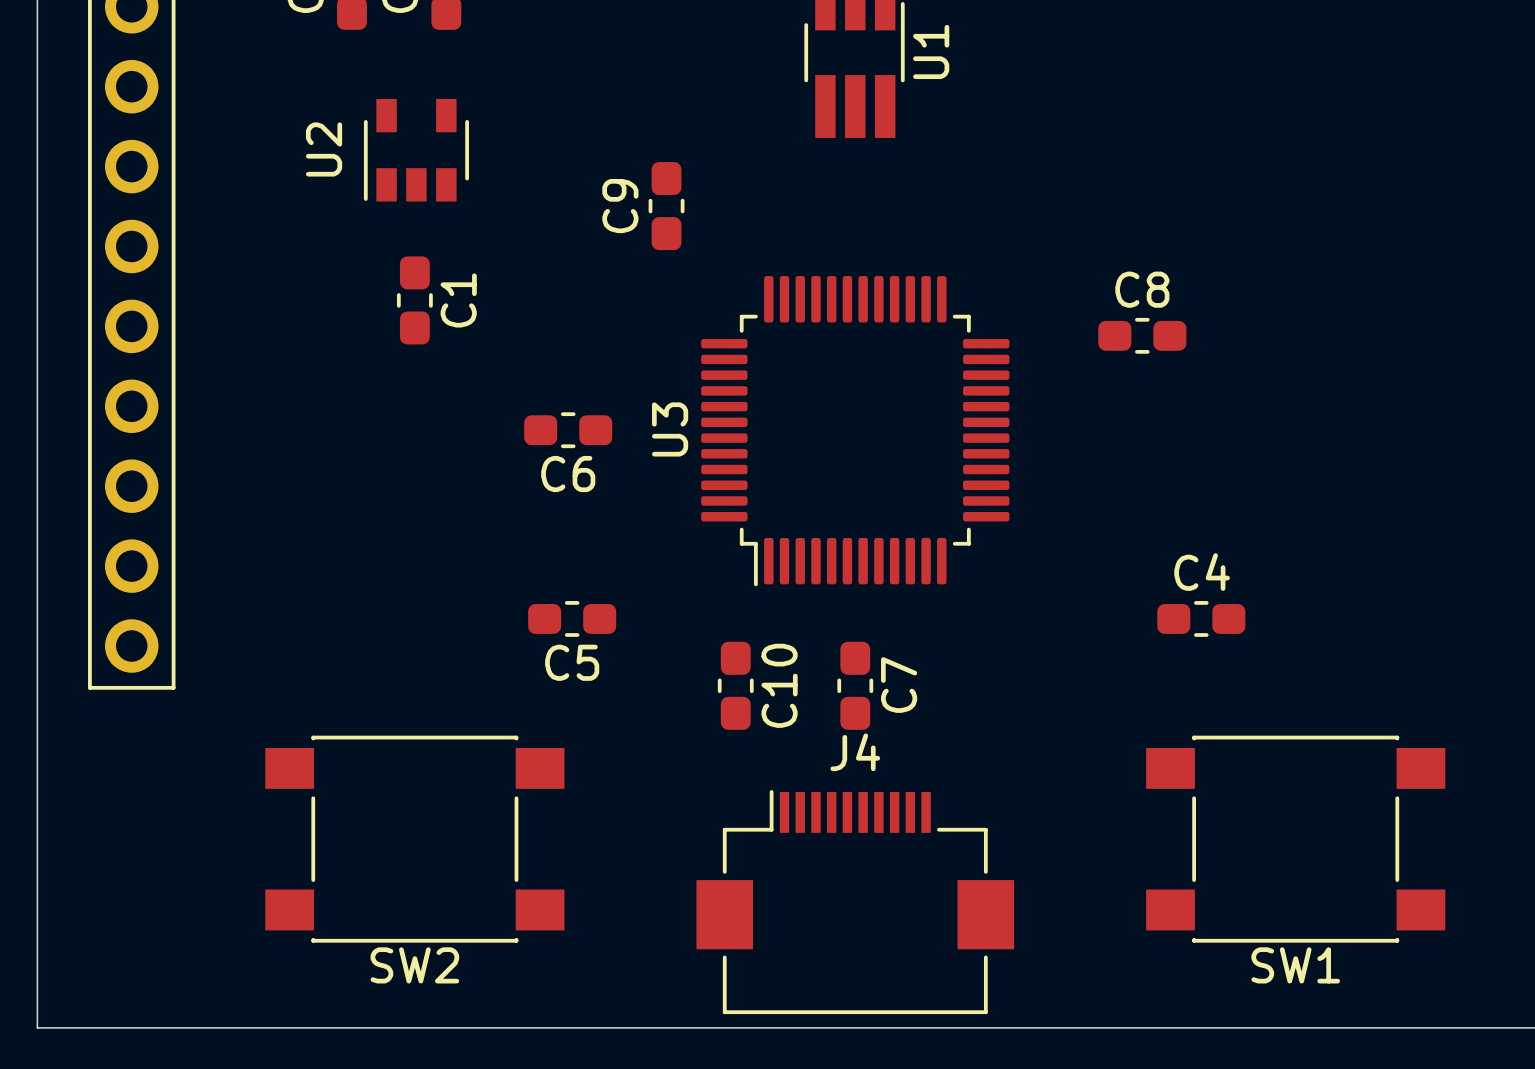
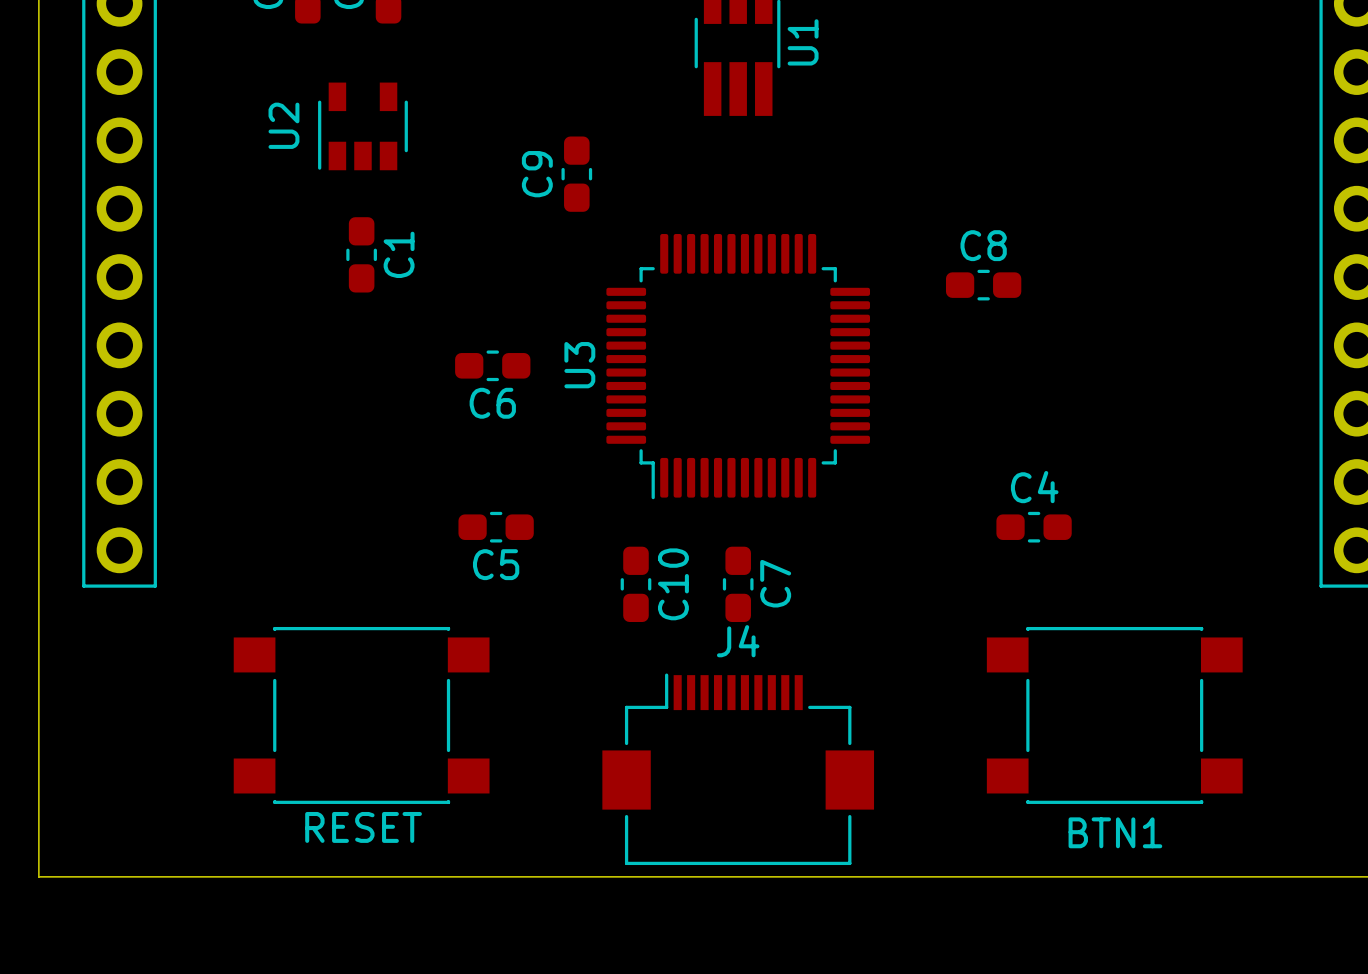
SW2 name: SW2 (414, 965) -> none
SW1 name: SW1 (1295, 965) -> none
text: none -> RESET (363, 827)
text: none -> BTN1 (1115, 832)

